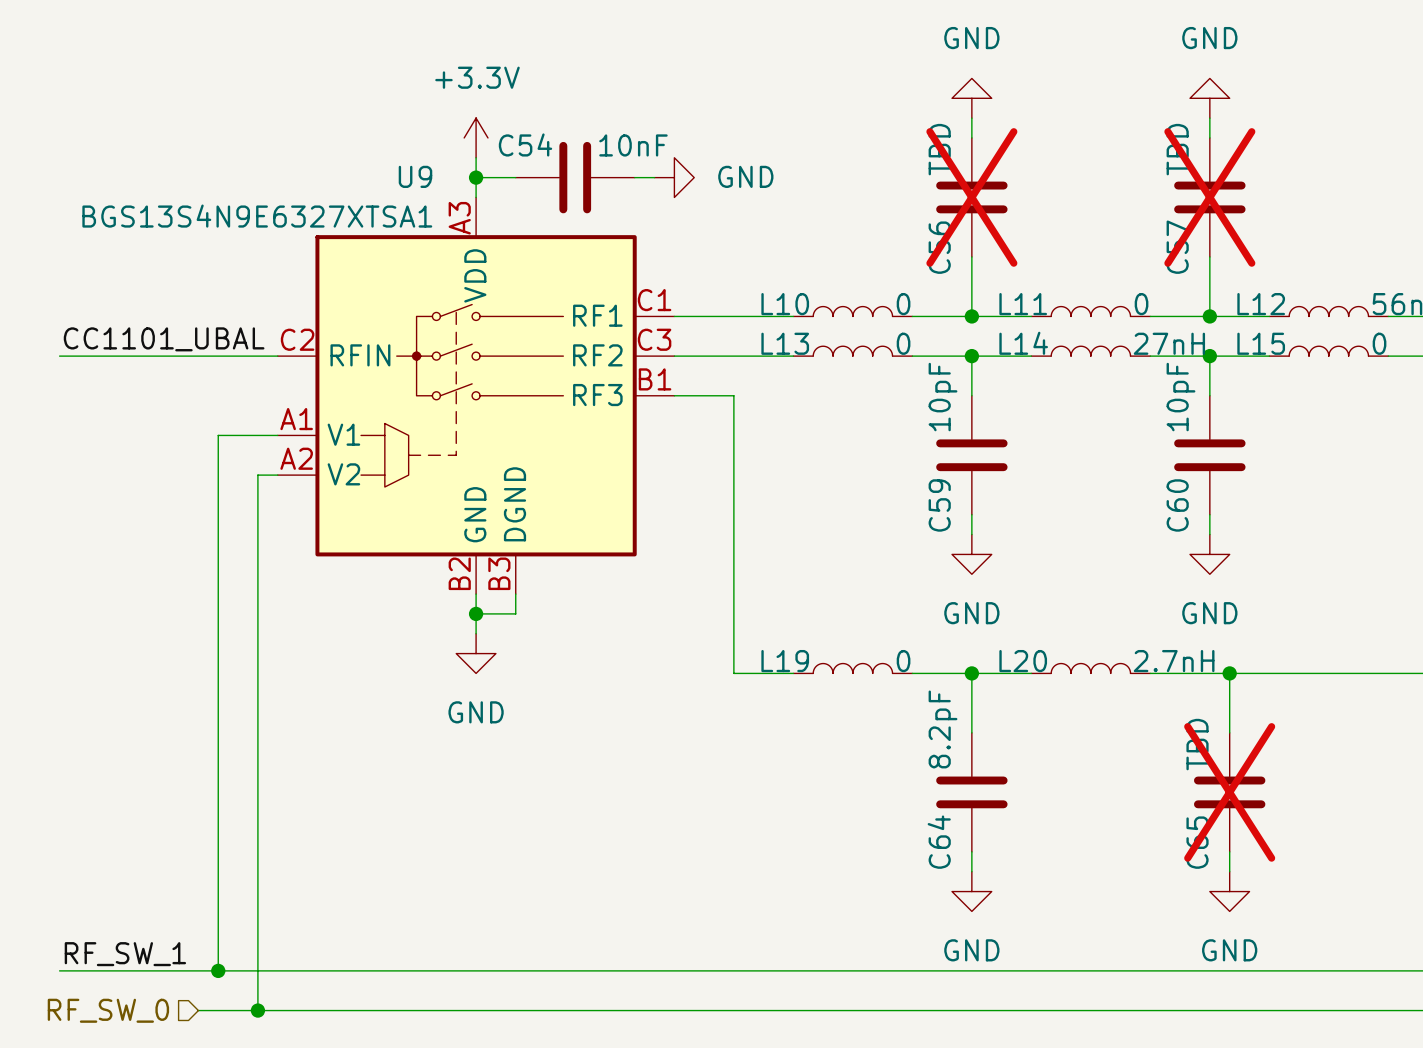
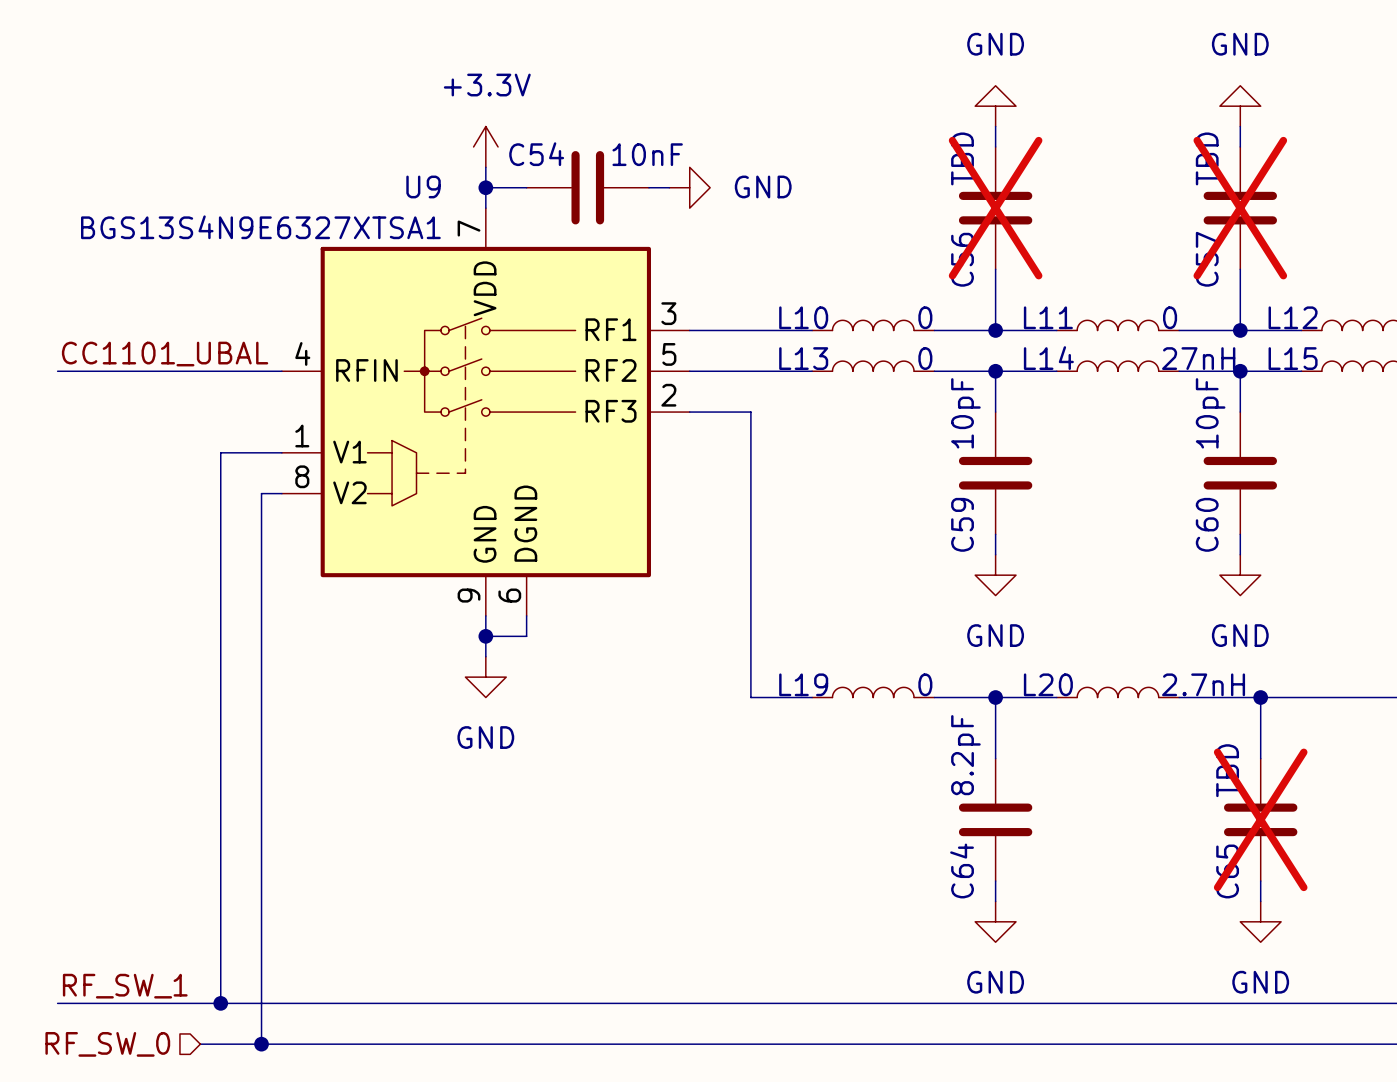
U9 symbol: [277, 197, 675, 595] -> [281, 208, 690, 616]

